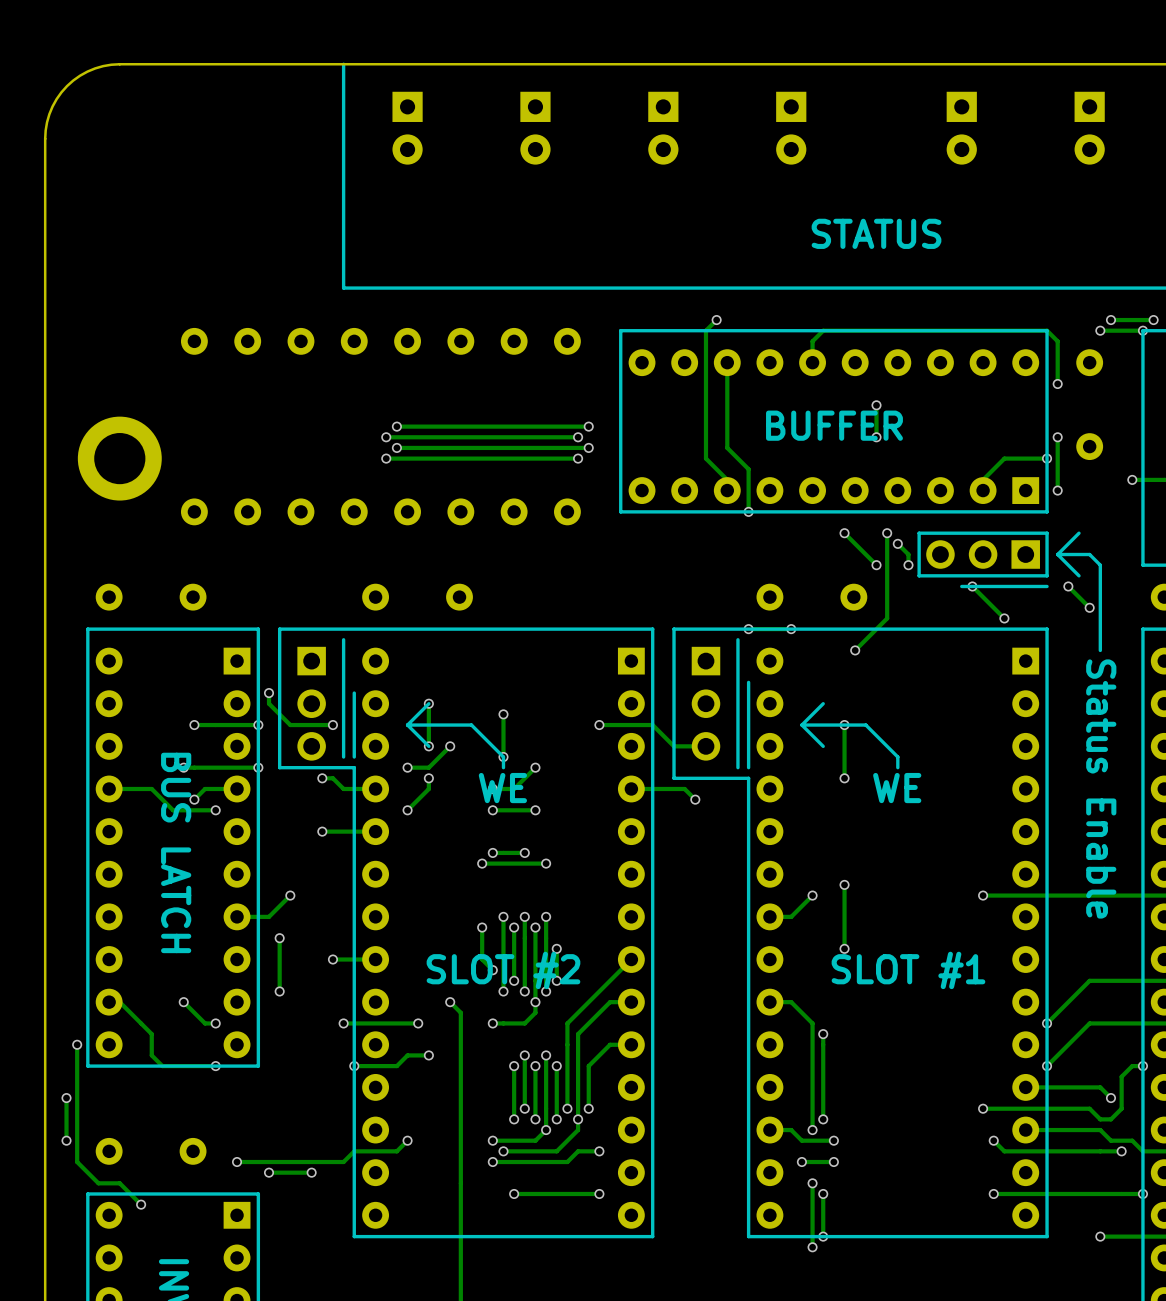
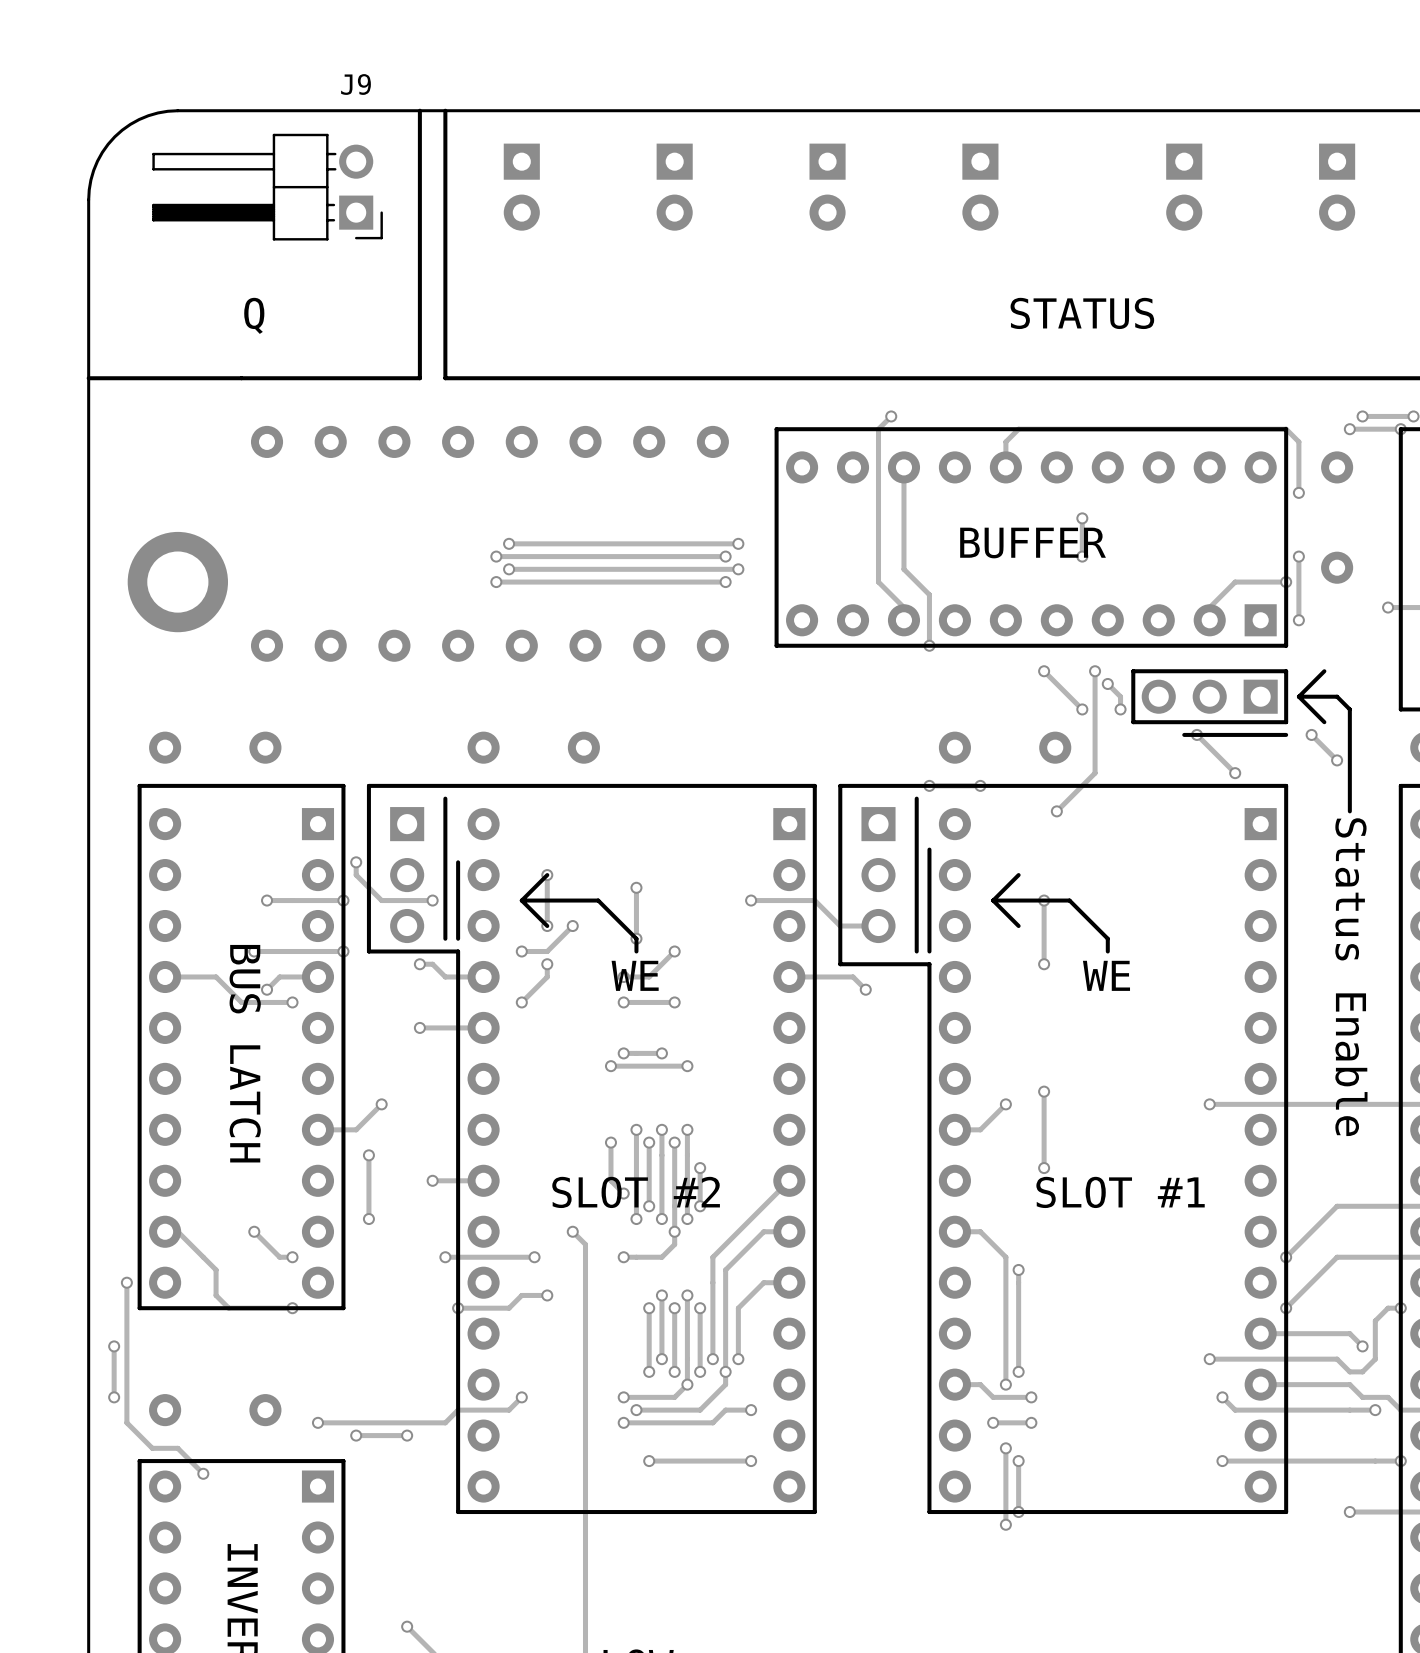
line: none -> (419, 110) (419, 378) (88, 378)
J9: none -> (267, 187)
text: none -> Q (254, 315)

